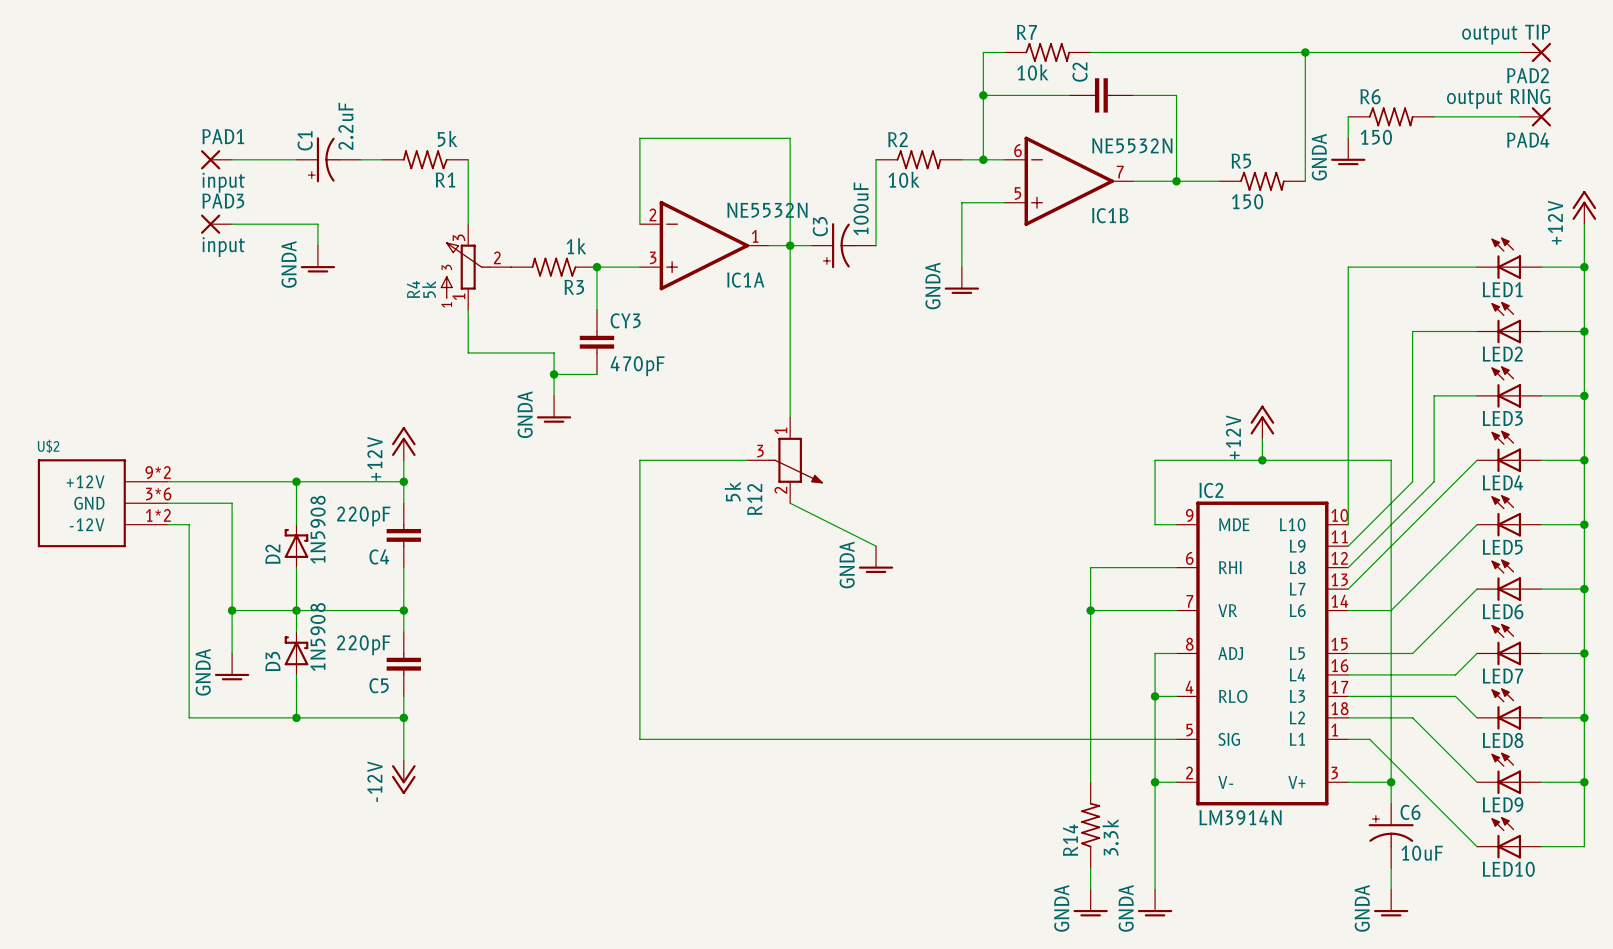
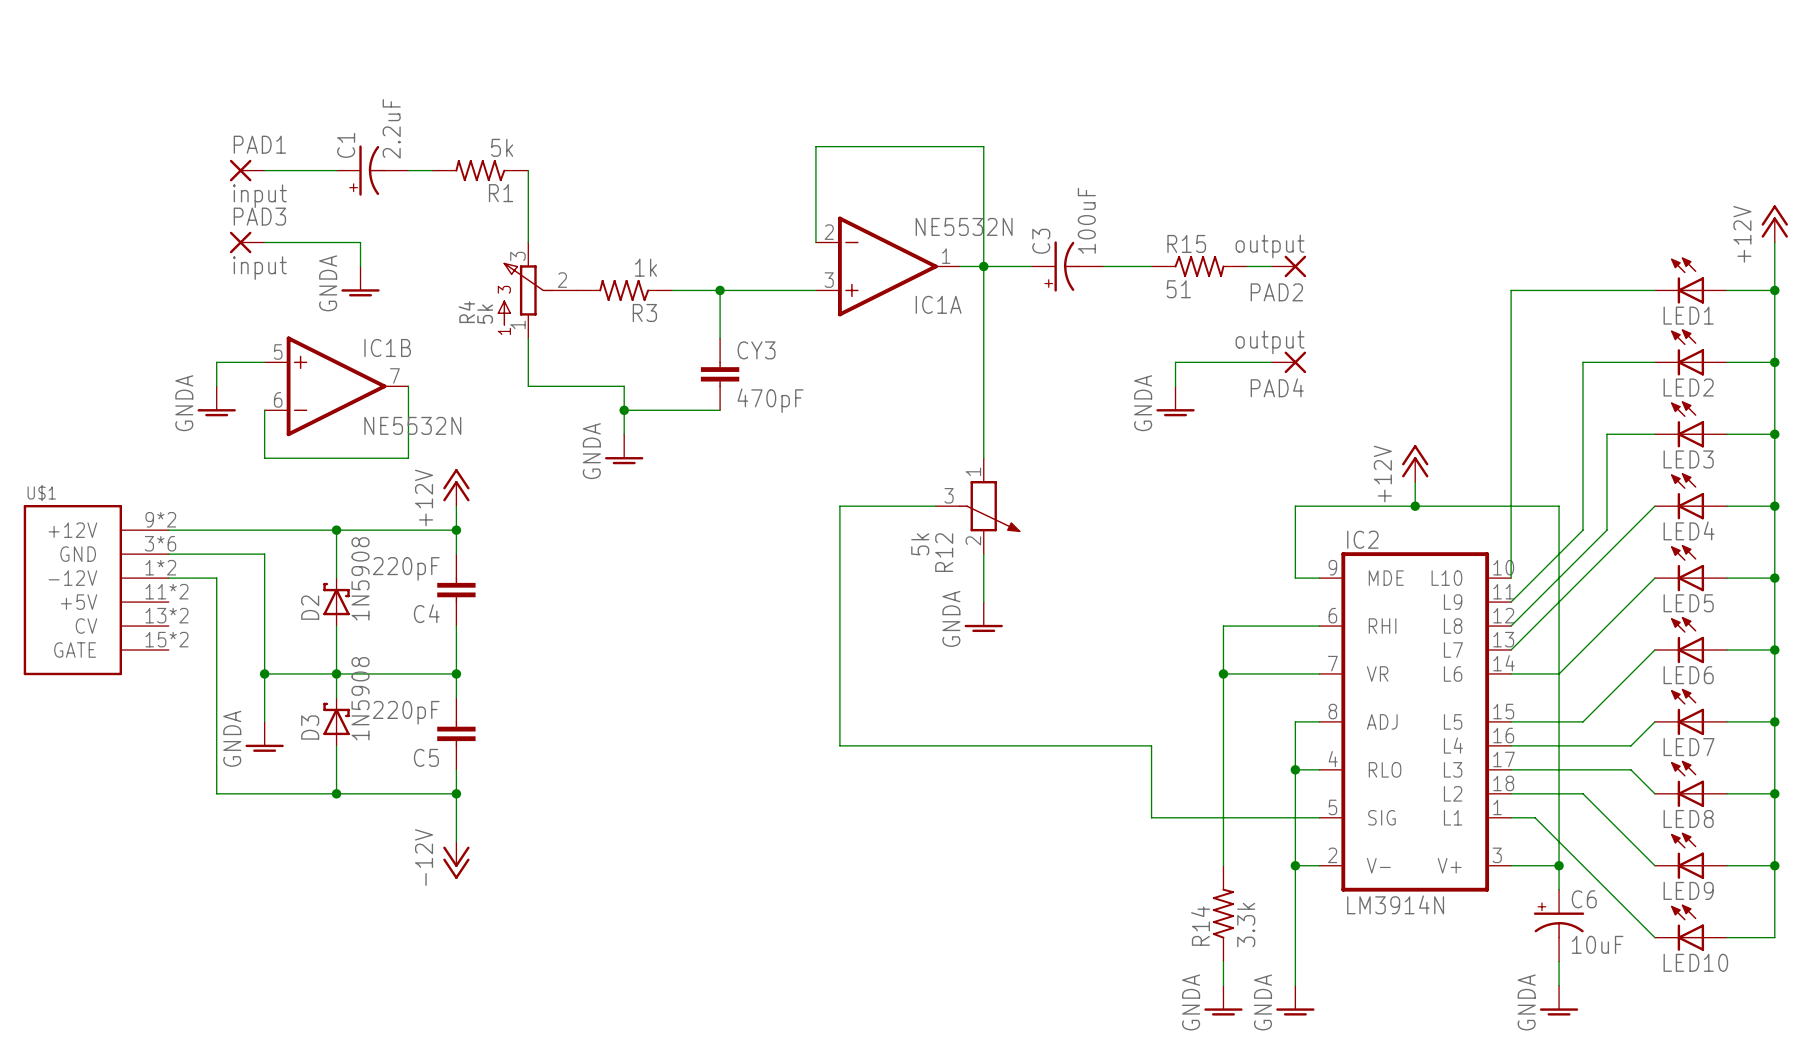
PAD2 value: output TIP (1506, 34) -> output (1270, 246)
wire: (1004, 52) (983, 52) (983, 159) -> none
R7: 10k (1047, 52) -> none
wire: (1090, 52) (1519, 52) -> none
wire: (1305, 52) (1305, 181) -> none
junction: (1305, 52) -> none
PAD2 position: (1535, 52) -> (1288, 266)
wire: (983, 95) (1069, 95) -> none
junction: (983, 95) -> none
C2: (1101, 95) -> none
wire: (1133, 95) (1176, 95) (1176, 181) -> none
PAD4 value: output RING (1498, 98) -> output (1270, 342)
wire: (1348, 116) (1348, 138) -> none
R6: 150 (1391, 116) -> none
wire: (1434, 116) (1519, 116) -> none
PAD4 position: (1535, 116) -> (1288, 362)
wire: (725, 138) (639, 138) (639, 224) -> (815, 146) (815, 242)
wire: (790, 138) (790, 417) -> (887, 146) (983, 146) (983, 170)
power symbol: GNDA (1348, 151) -> none
R2: 10k (918, 159) -> none
wire: (961, 159) (1004, 159) -> (1103, 266) (1151, 266)
junction: (983, 159) -> none
IC1B flip: as is (1069, 181) -> up-down (336, 386)
IC1B position: (1069, 181) -> (336, 386)
wire: (1133, 181) (1219, 181) -> none
junction: (1176, 181) -> none
R5: 150 (1262, 181) -> none
wire: (1004, 202) (961, 202) (961, 267) -> none
IC1A position: (704, 245) -> (887, 266)
wire: (768, 245) (811, 245) -> none
junction: (790, 245) -> none
C3 position: (843, 245) -> (1067, 266)
wire: none -> (959, 266) (1031, 266)
wire: none -> (983, 266) (983, 458)
junction: none -> (983, 266)
R15: none -> 51 (1199, 266)
wire: none -> (1247, 266) (1271, 266)
wire: (596, 267) (596, 310) -> none
junction position: (596, 267) -> (720, 290)
wire: none -> (815, 290) (720, 290) (720, 338)
power symbol position: GNDA (961, 280) -> GNDA (1175, 401)
wire: none -> (264, 362) (216, 362) (216, 386)
wire: none -> (1271, 362) (1175, 362) (1175, 386)
CY3 position: (596, 342) -> (720, 374)
wire: none -> (408, 386) (408, 458) (264, 458) (264, 410)
power symbol: none -> GNDA (216, 401)
wire: none -> (672, 410) (720, 410)
wire: (747, 460) (639, 460) (639, 739) (1026, 739) -> (935, 506) (839, 506) (839, 745) (1151, 745) (1151, 817)
R12 position: (785, 460) -> (978, 506)
U$2: (102, 503) -> none
wire: (790, 503) (876, 546) -> (983, 554) (983, 602)
U$1: none -> (96, 590)

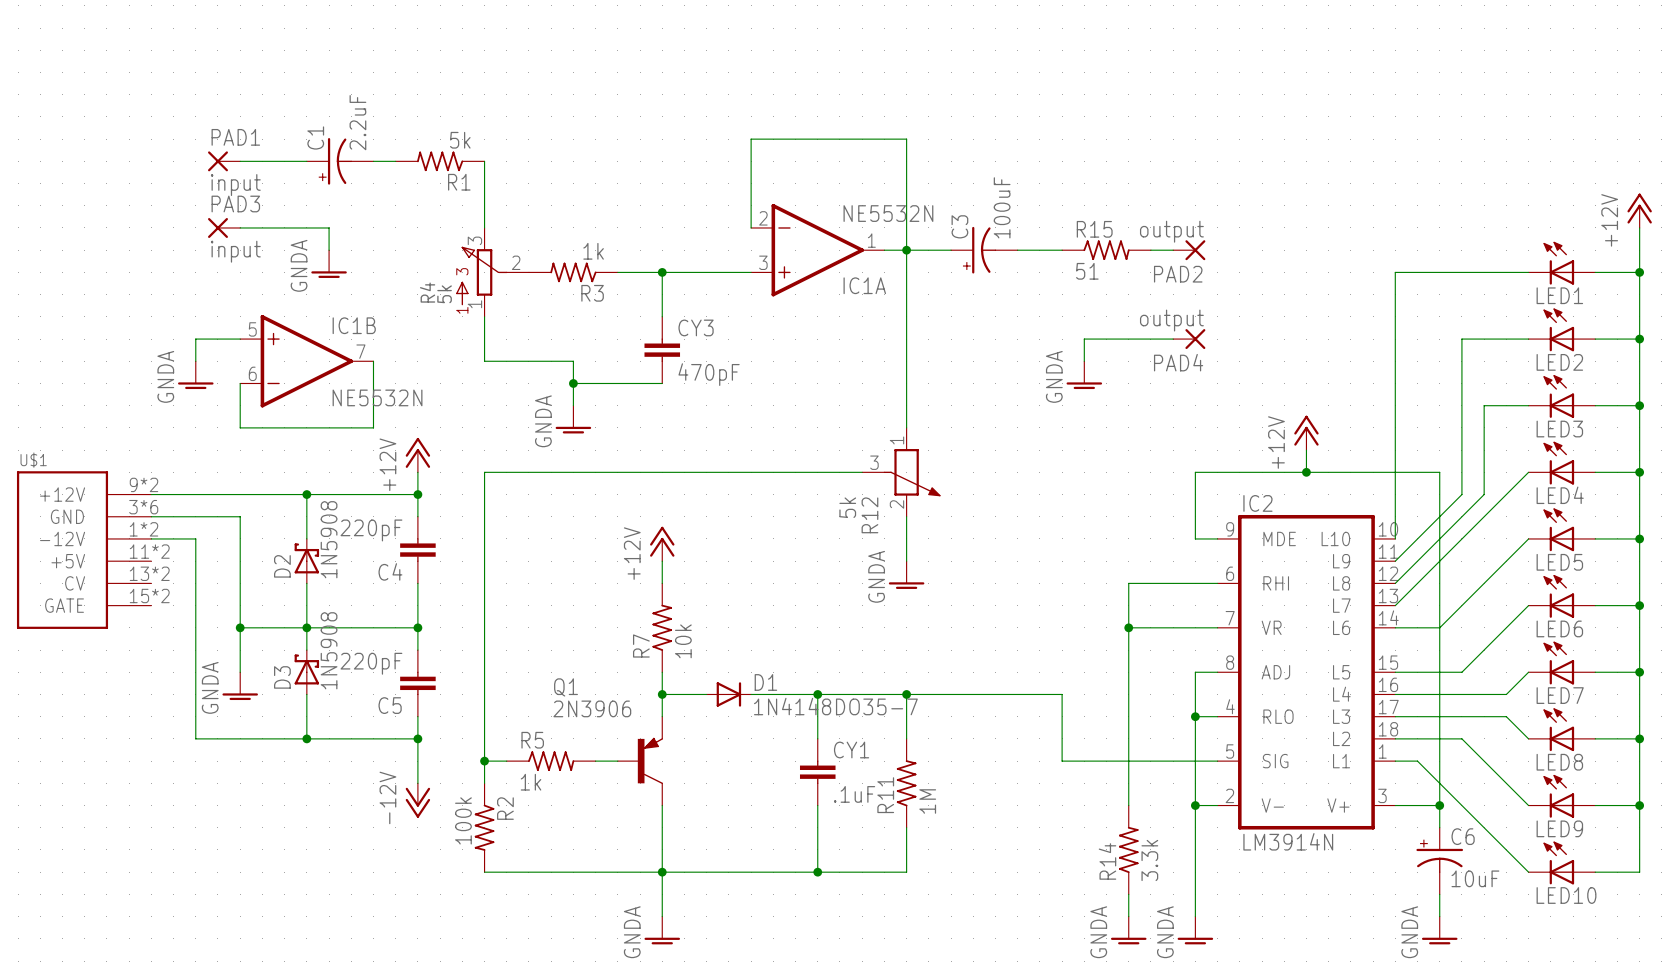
wire: (839, 506) (839, 745) -> (751, 694) (773, 694)
wire: none -> (773, 472) (484, 472) (484, 783)
power symbol: none -> +12V (662, 543)
wire: none -> (662, 561) (662, 583)
R7: none -> 10k (662, 627)
wire: none -> (662, 672) (662, 716)
wire: none -> (662, 694) (706, 694)
junction: none -> (662, 694)
D1: none -> 1N4148DO35-7 (728, 694)
wire: none -> (817, 694) (817, 738)
junction: none -> (817, 694)
wire: none -> (906, 694) (906, 738)
junction: none -> (906, 694)
wire: none -> (484, 761) (506, 761)
junction: none -> (484, 761)
R5: none -> 1k (551, 761)
wire: none -> (595, 761) (617, 761)
Q1: none -> 2N3906 (640, 761)
CY1: none -> .1uF (817, 772)
R11: none -> 1M (906, 783)
wire: none -> (662, 805) (662, 916)
wire: none -> (817, 805) (817, 872)
R2: none -> 100k (484, 827)
wire: none -> (906, 827) (906, 872) (484, 872)
junction: none -> (662, 872)
junction: none -> (817, 872)
power symbol: none -> GNDA (662, 930)

